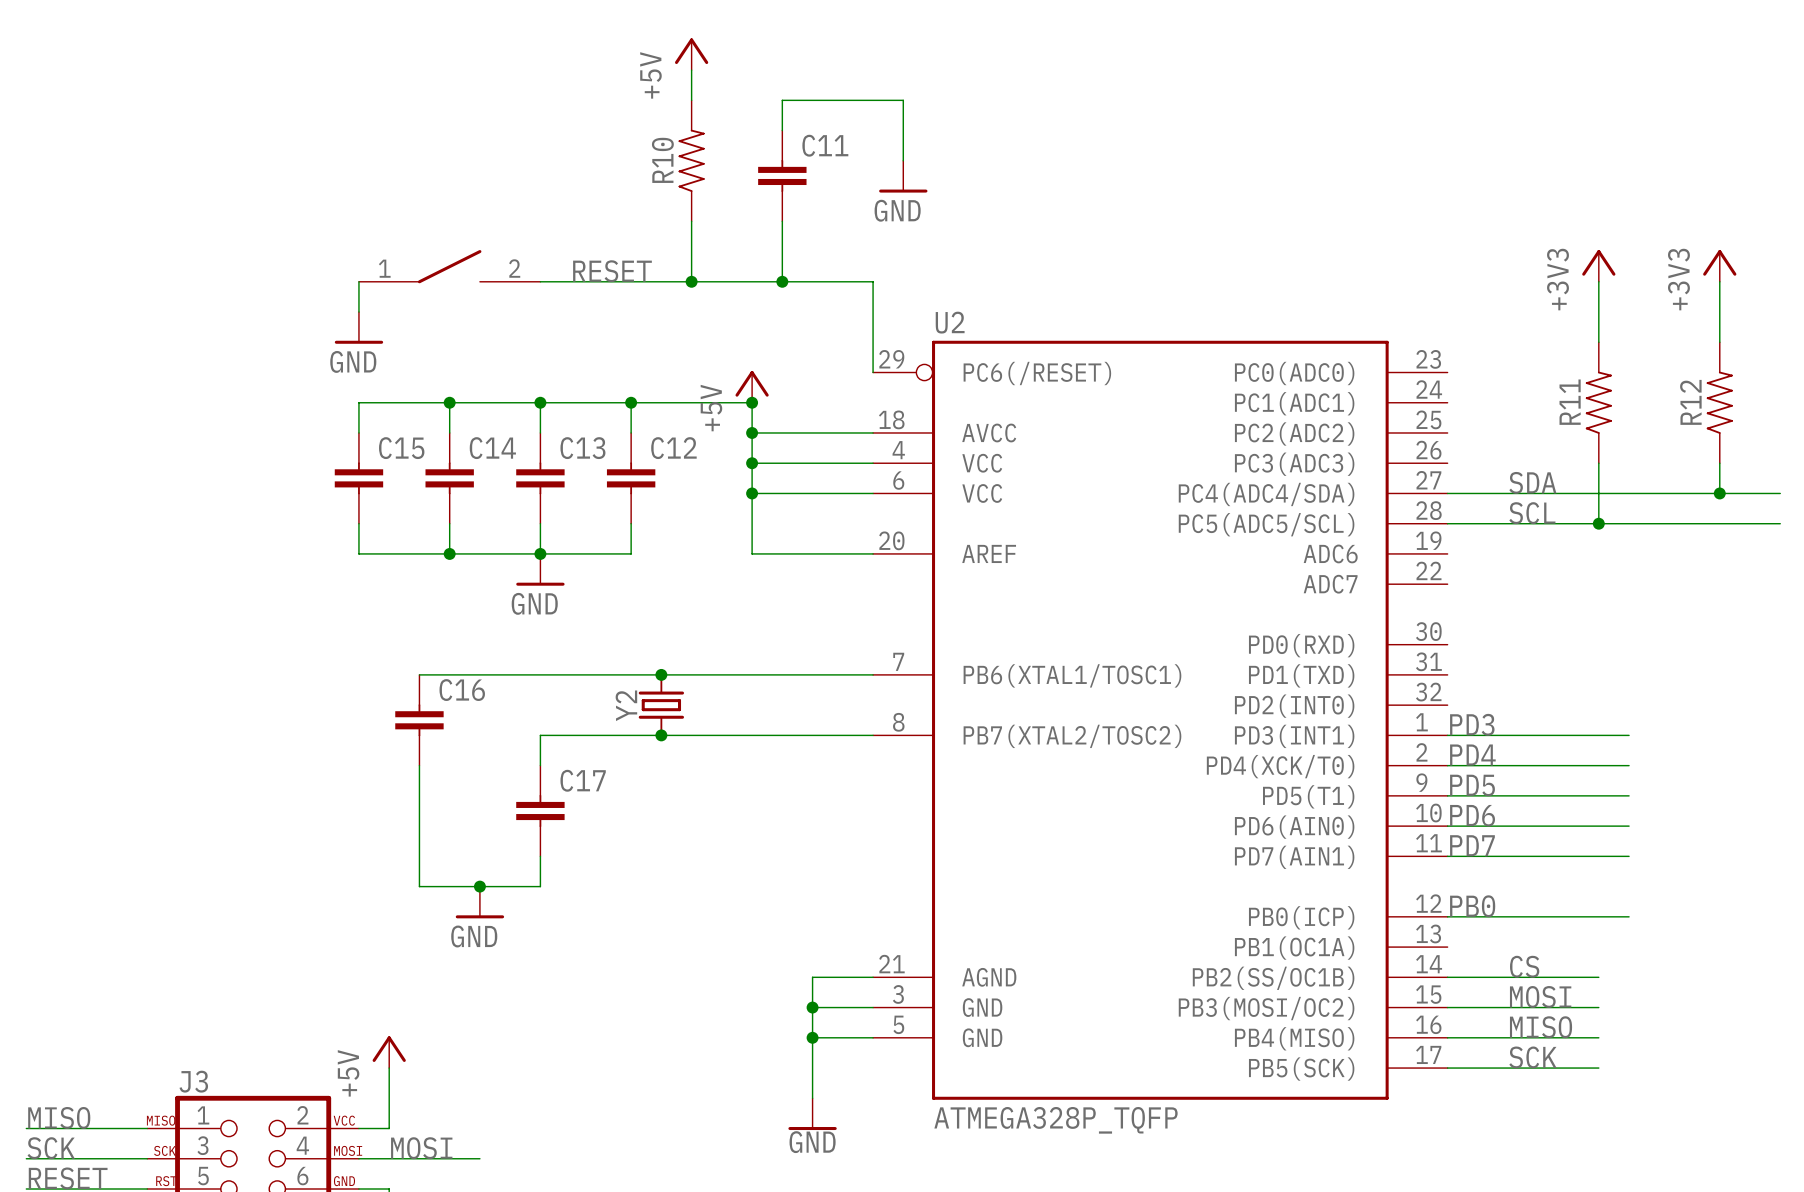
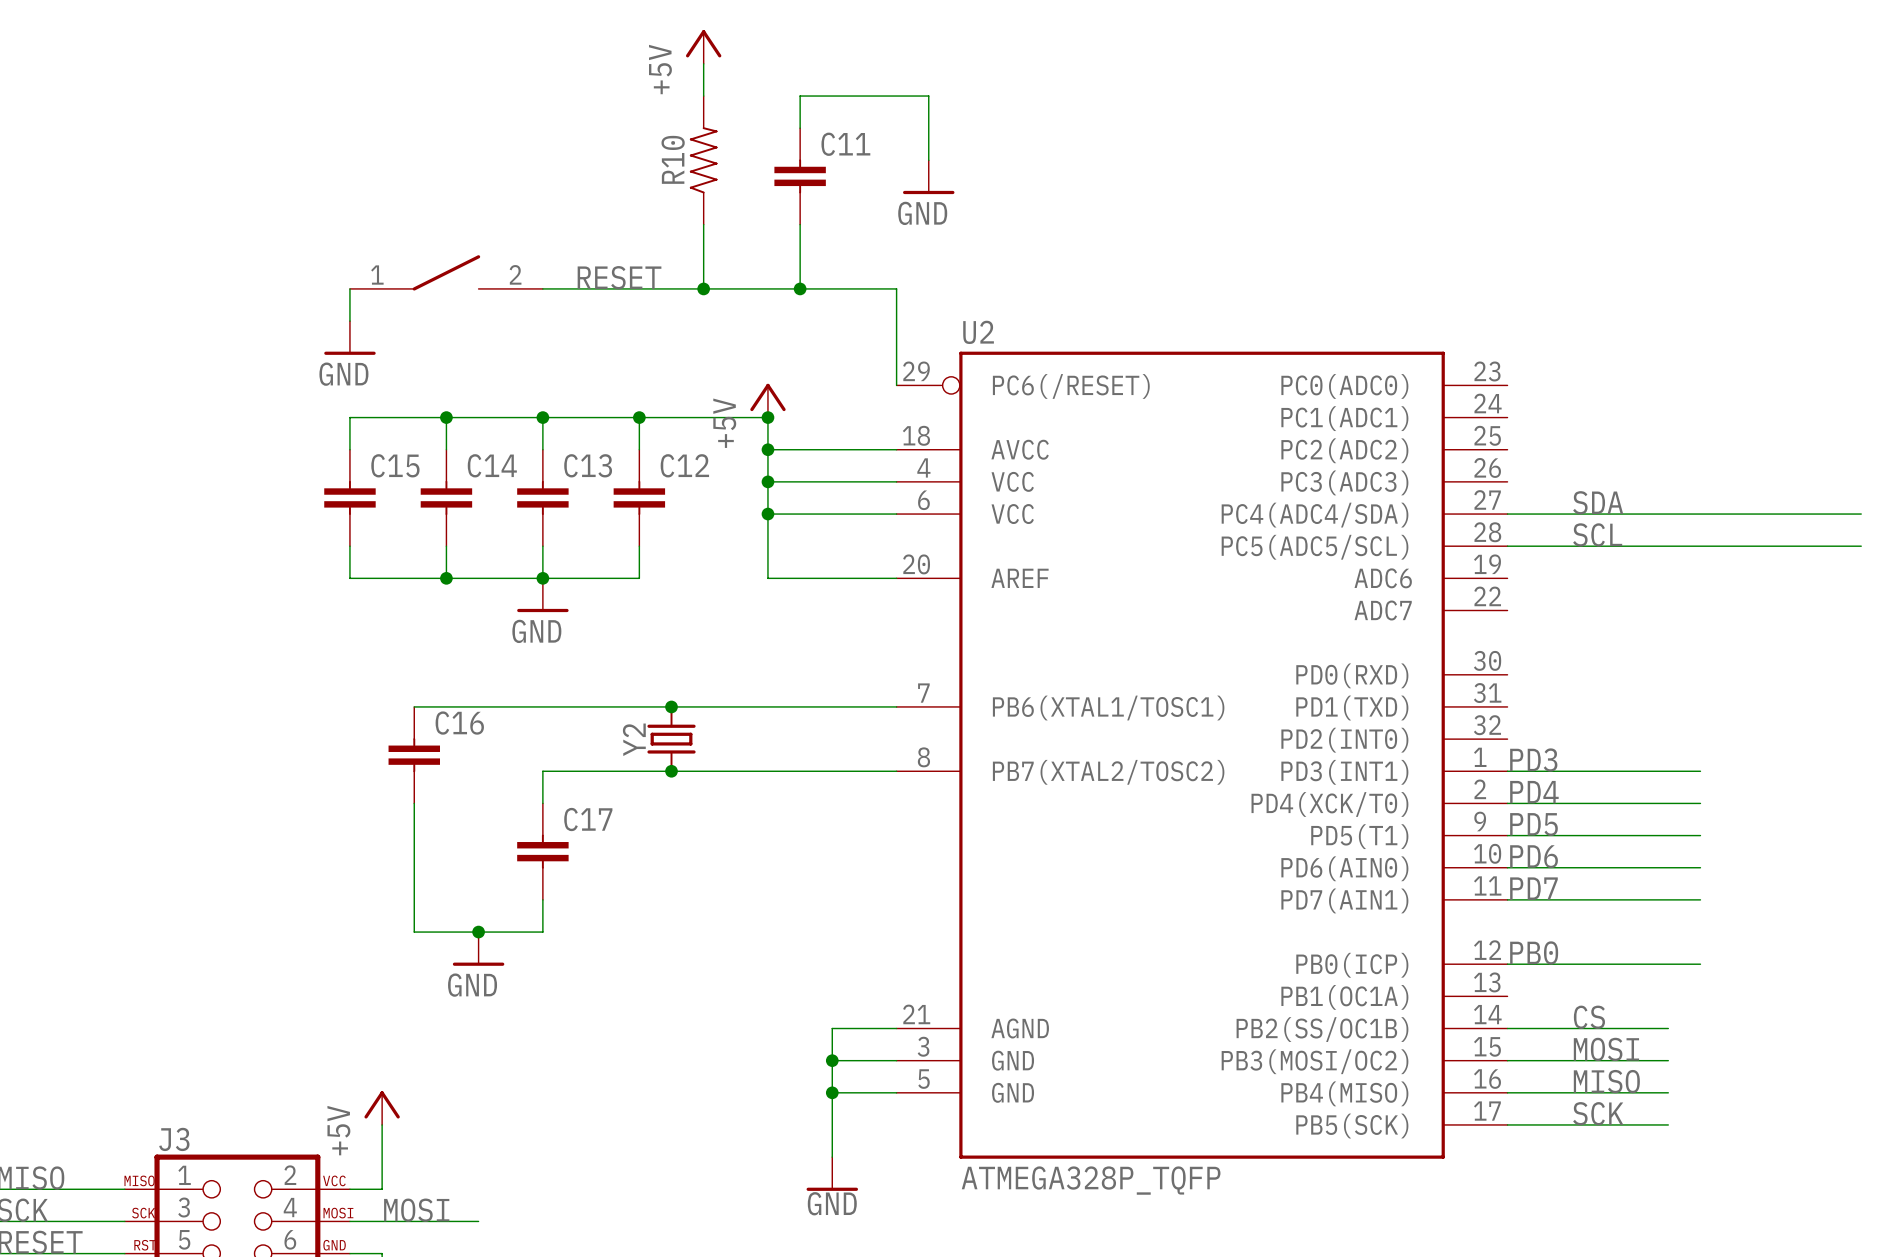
power symbol: +3V3 (1598, 265) -> none
power symbol: +3V3 (1719, 265) -> none
wire: (1598, 281) (1598, 342) -> none
wire: (1719, 281) (1719, 342) -> none
R11: (1598, 402) -> none
R12: (1719, 402) -> none
wire: (1598, 463) (1598, 523) -> none
wire: (1719, 463) (1719, 493) -> none
junction: (1719, 493) -> none
junction: (1598, 523) -> none

